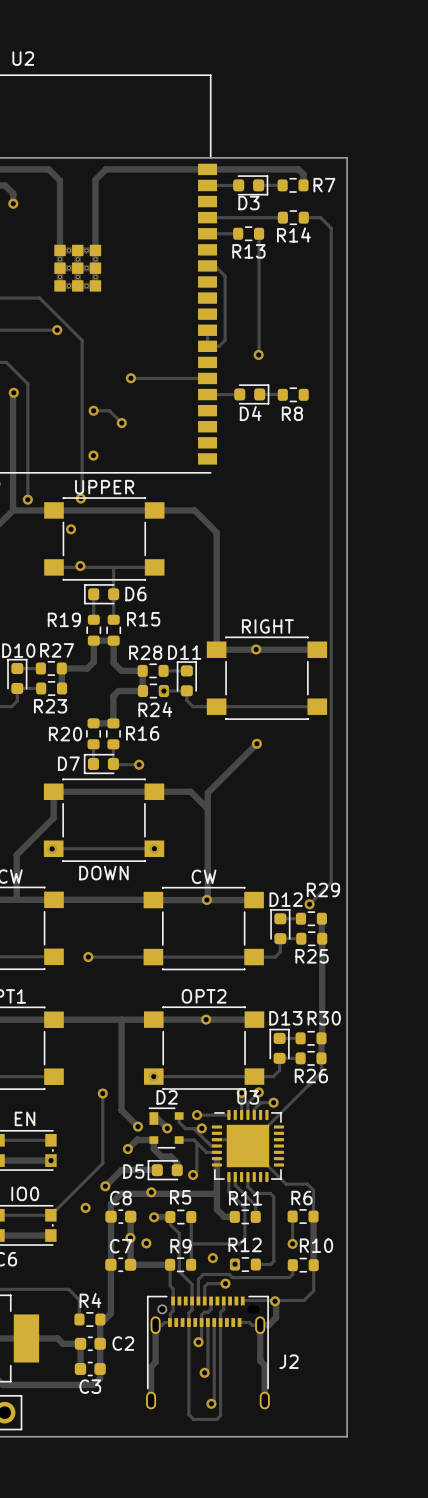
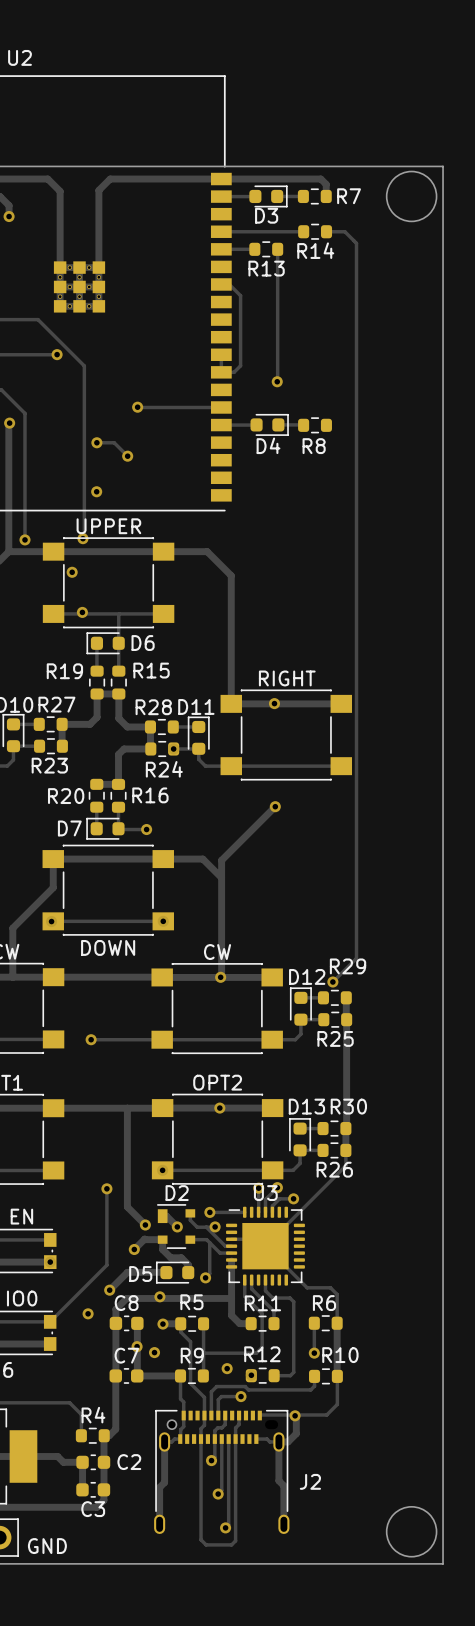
board edge: (347, 157) (347, 1436) -> (373, 166) (443, 166) (443, 1563) (373, 1563)
round board edge: none -> [385, 170, 438, 223]
round board edge: none -> [385, 1506, 438, 1558]
text: none -> GND (47, 1546)

